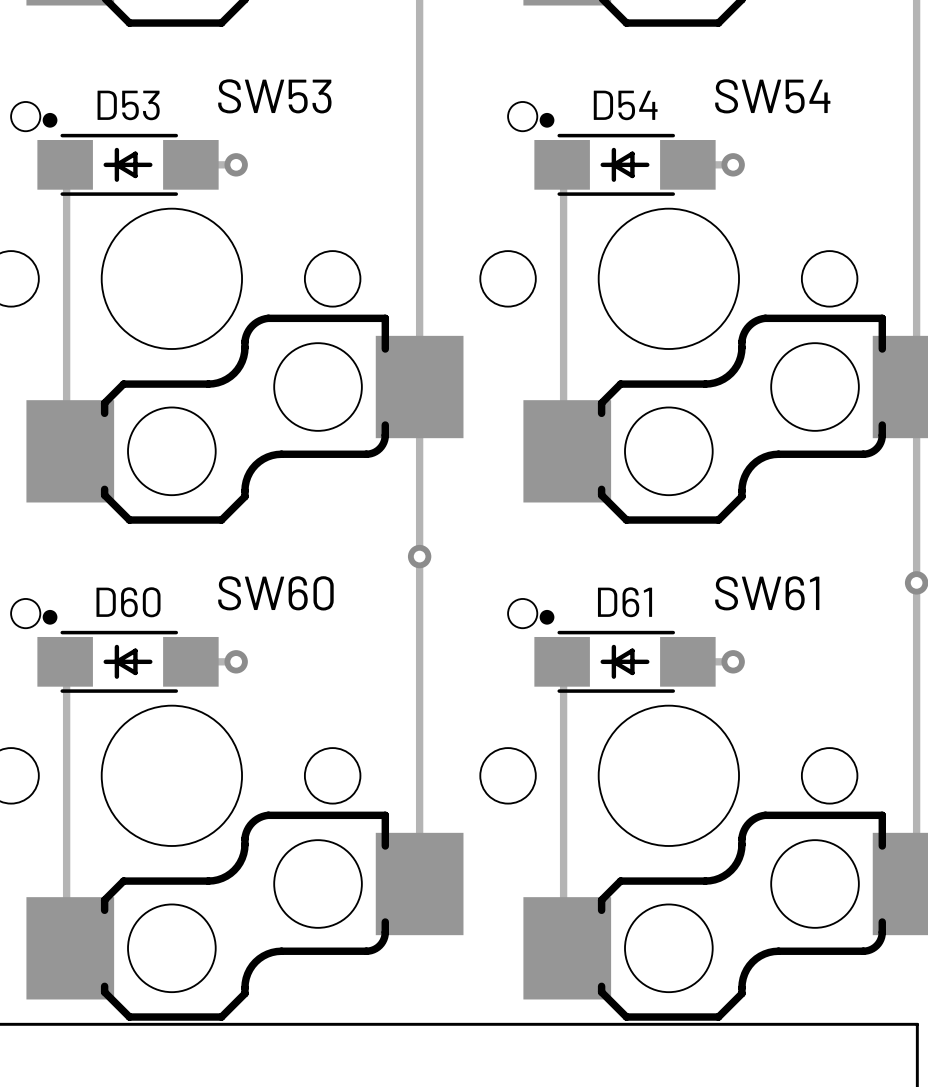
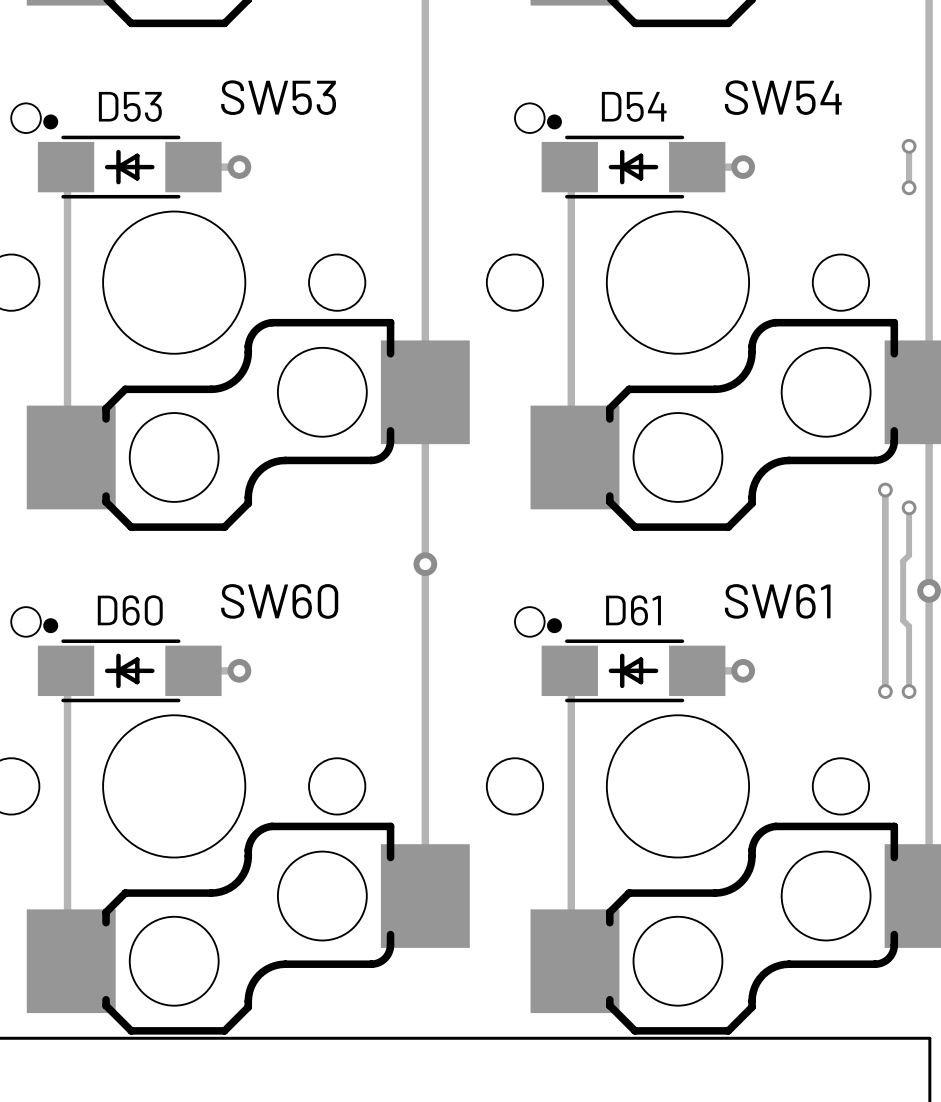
track: none -> (909, 146) (909, 187)
via: none -> (909, 146)
via: none -> (909, 187)
track: none -> (885, 490) (885, 691)
via: none -> (885, 490)
track: none -> (909, 507) (909, 555) (903, 561) (903, 620) (909, 626) (909, 691)
via: none -> (909, 507)
via: none -> (885, 691)
via: none -> (909, 691)

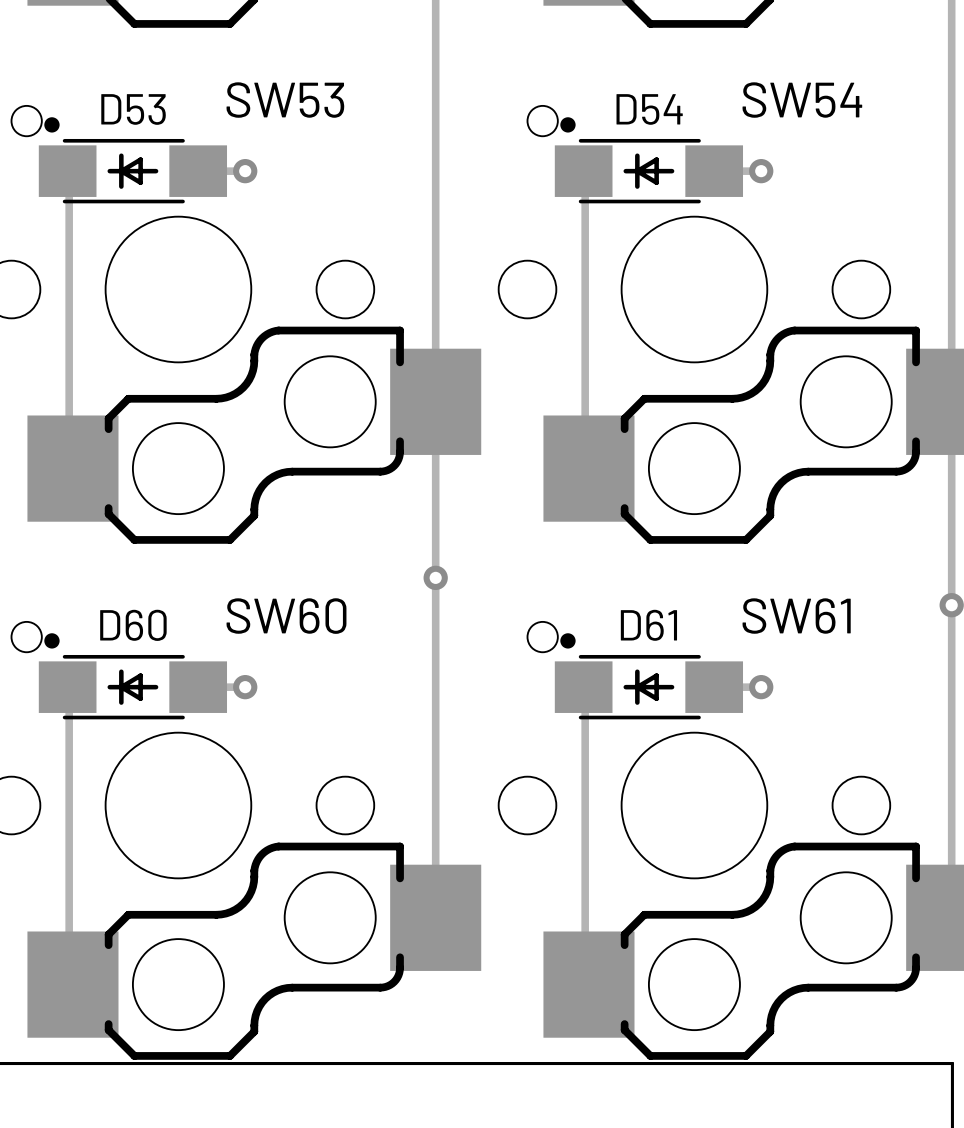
track: (909, 146) (909, 187) -> none
via: (909, 146) -> none
via: (909, 187) -> none
track: (885, 490) (885, 691) -> none
via: (885, 490) -> none
track: (909, 507) (909, 555) (903, 561) (903, 620) (909, 626) (909, 691) -> none
via: (909, 507) -> none
via: (885, 691) -> none
via: (909, 691) -> none

